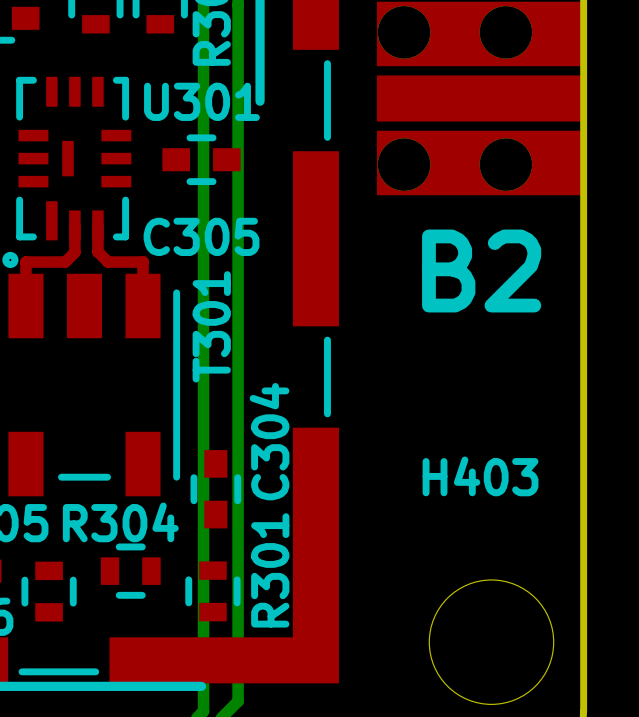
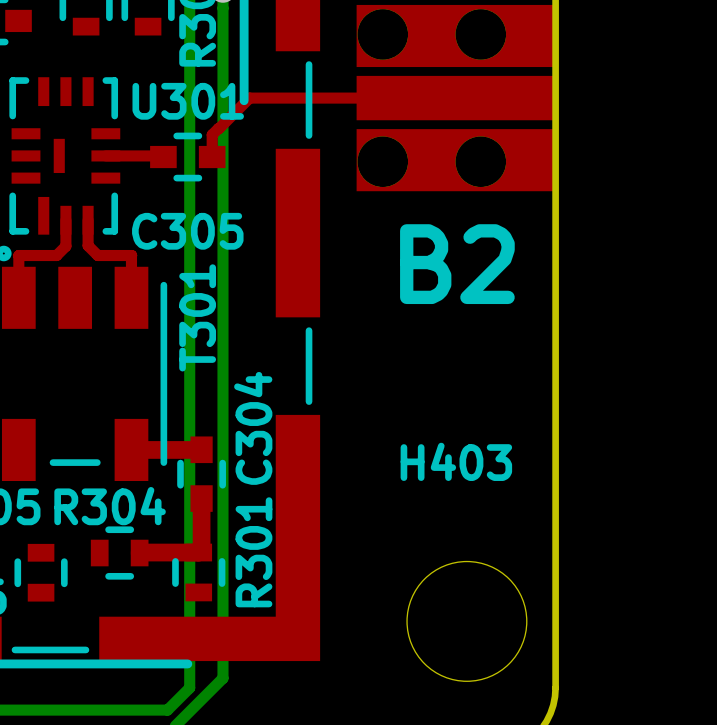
top track: none -> (457, 98) (249, 98) (219, 128)
top track: none -> (218, 128) (212, 134) (212, 157)
top track: none -> (105, 155) (163, 157)
top track: none -> (131, 449) (201, 449)
top track: none -> (201, 498) (201, 549) (198, 552) (140, 552)

